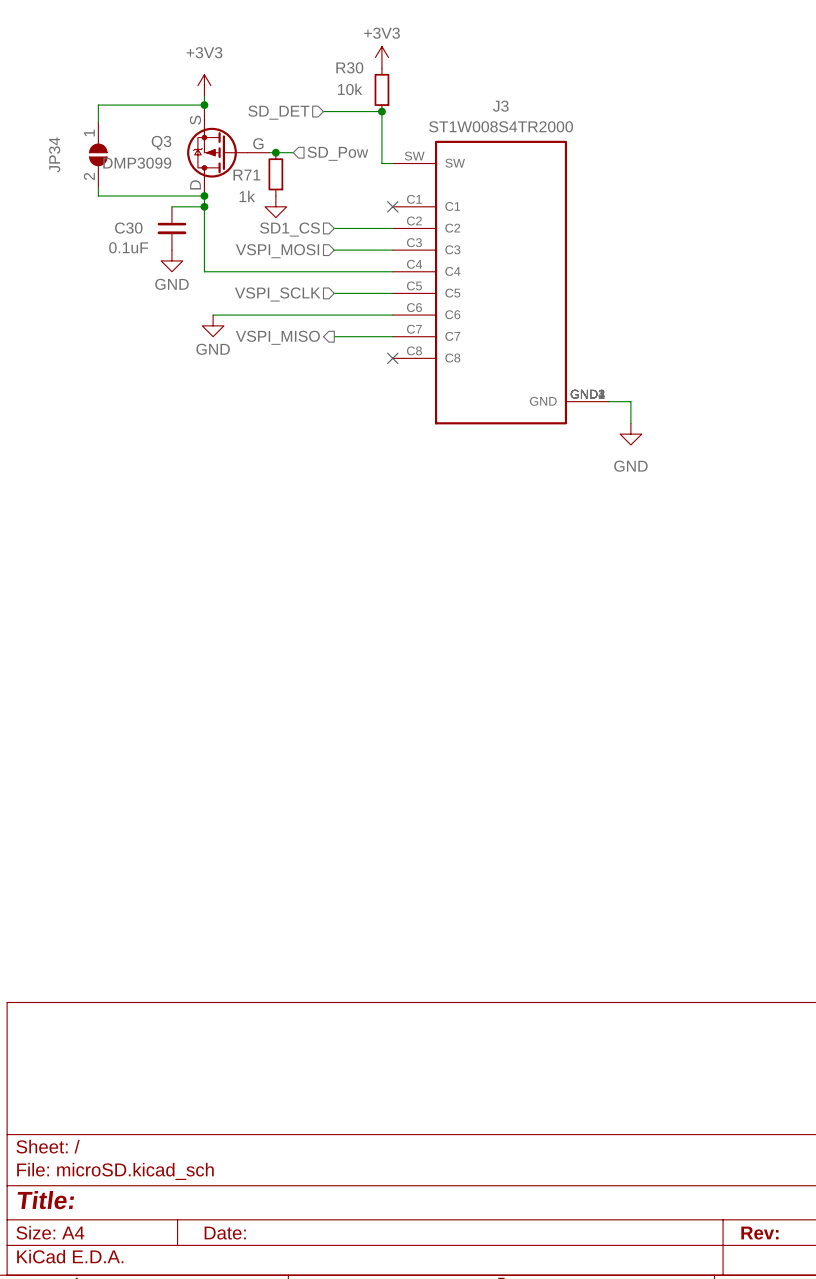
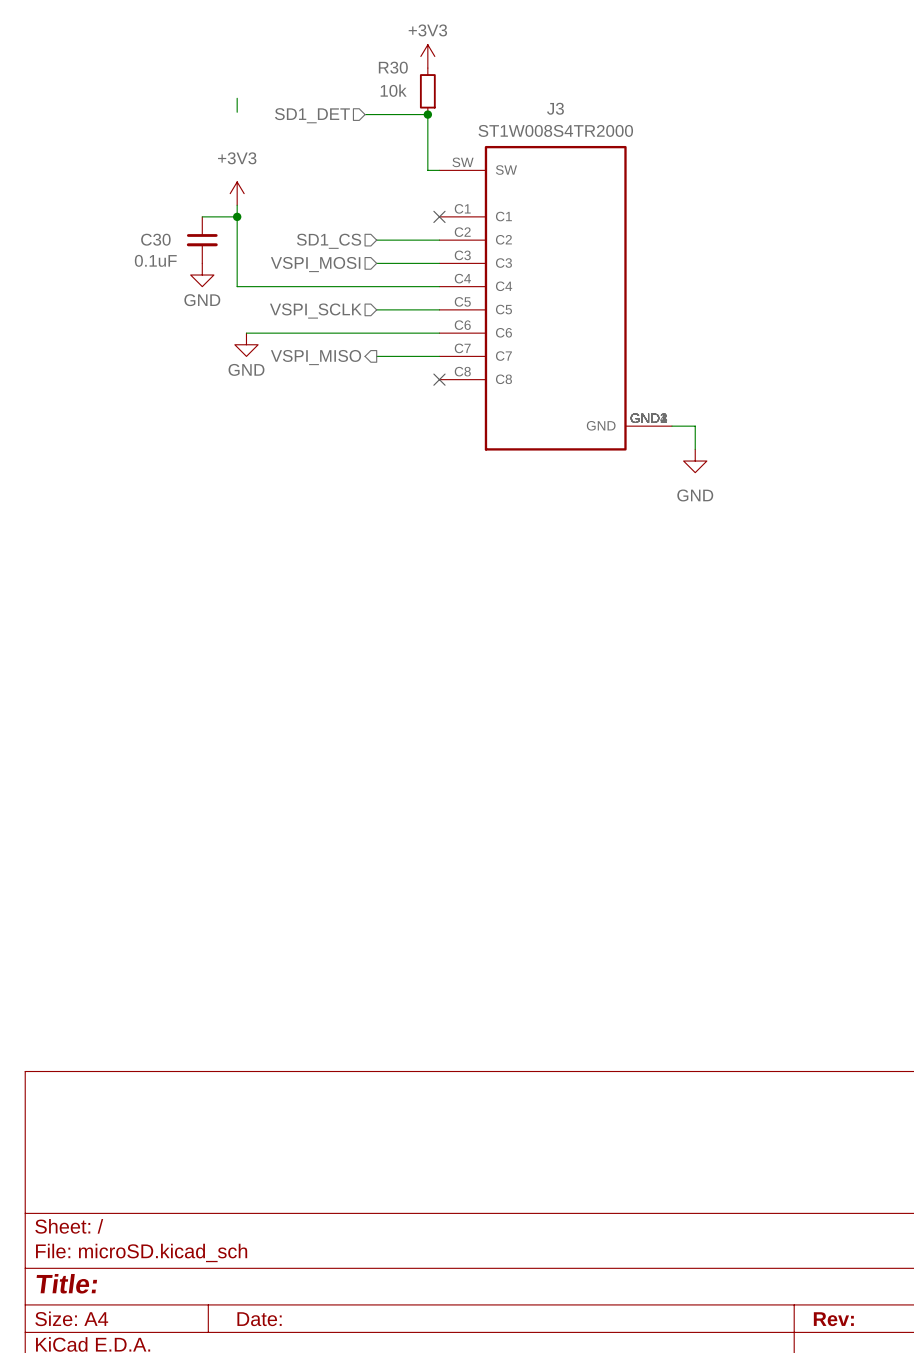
power symbol position: +3V3 (204, 85) -> +3V3 (237, 193)
wire: (204, 105) (98, 105) (98, 122) -> none
junction: (204, 105) -> none
hierarchical label: SD_DET (278, 112) -> SD1_DET (312, 115)
Q3: DMP3099 (228, 152) -> none
wire: (269, 152) (293, 152) -> none
junction: (275, 152) -> none
hierarchical label: SD_Pow (337, 153) -> none
JP34: (98, 154) -> none
R71: 1k (275, 174) -> none
wire: (98, 187) (98, 195) (204, 195) -> none
junction: (204, 195) -> none
power symbol: (275, 206) -> none

